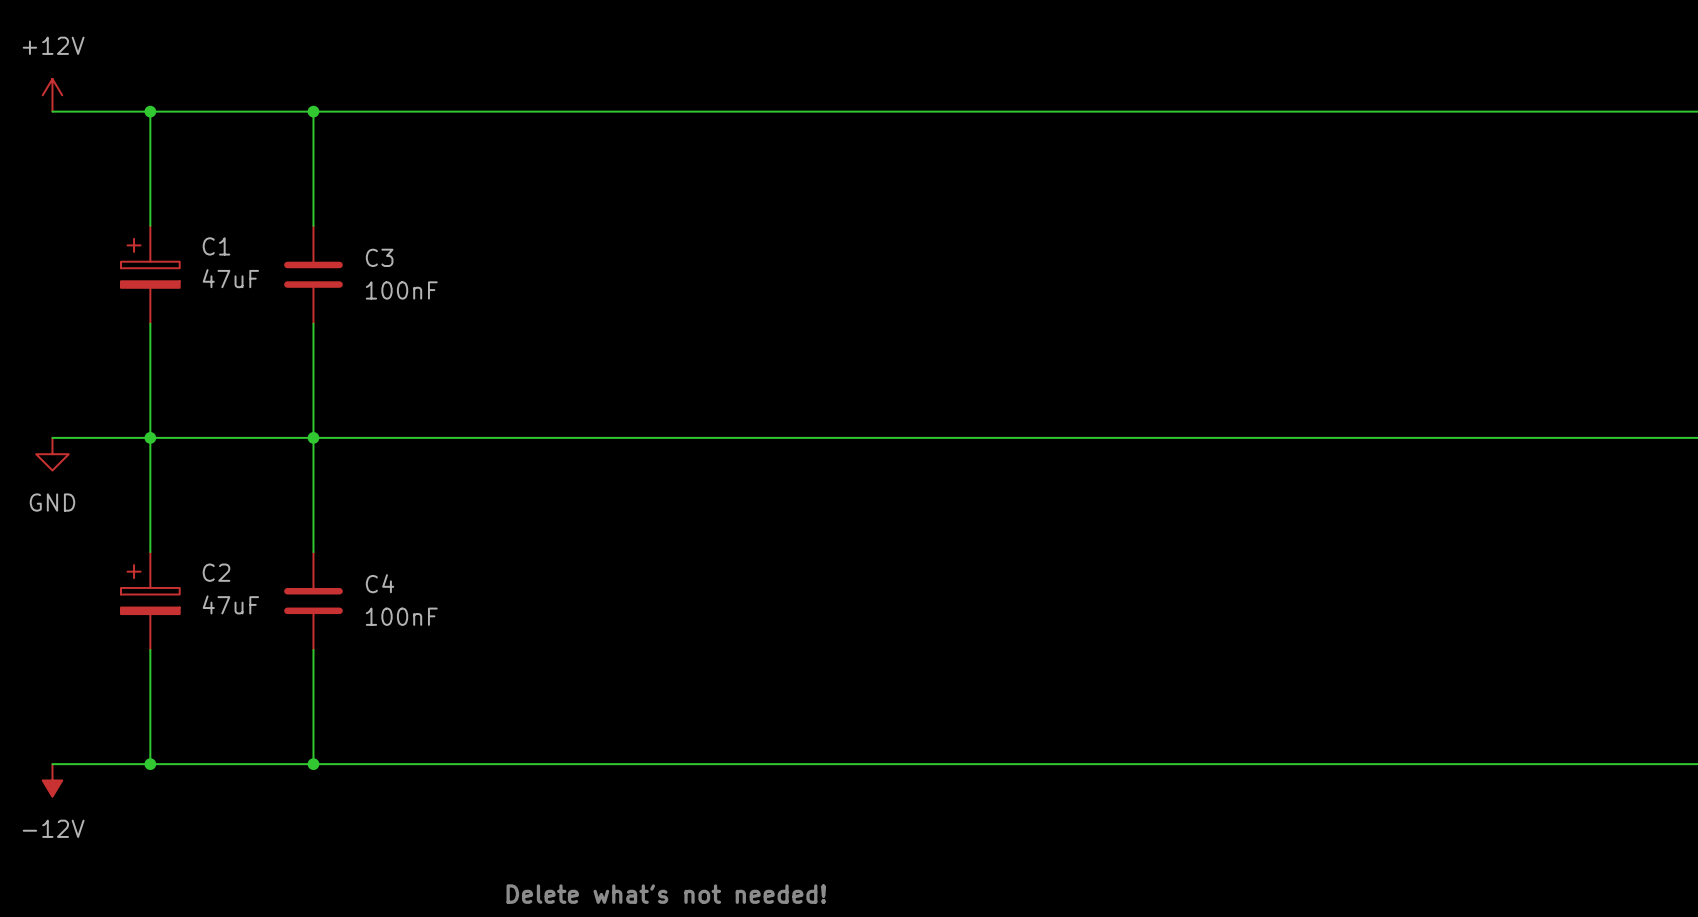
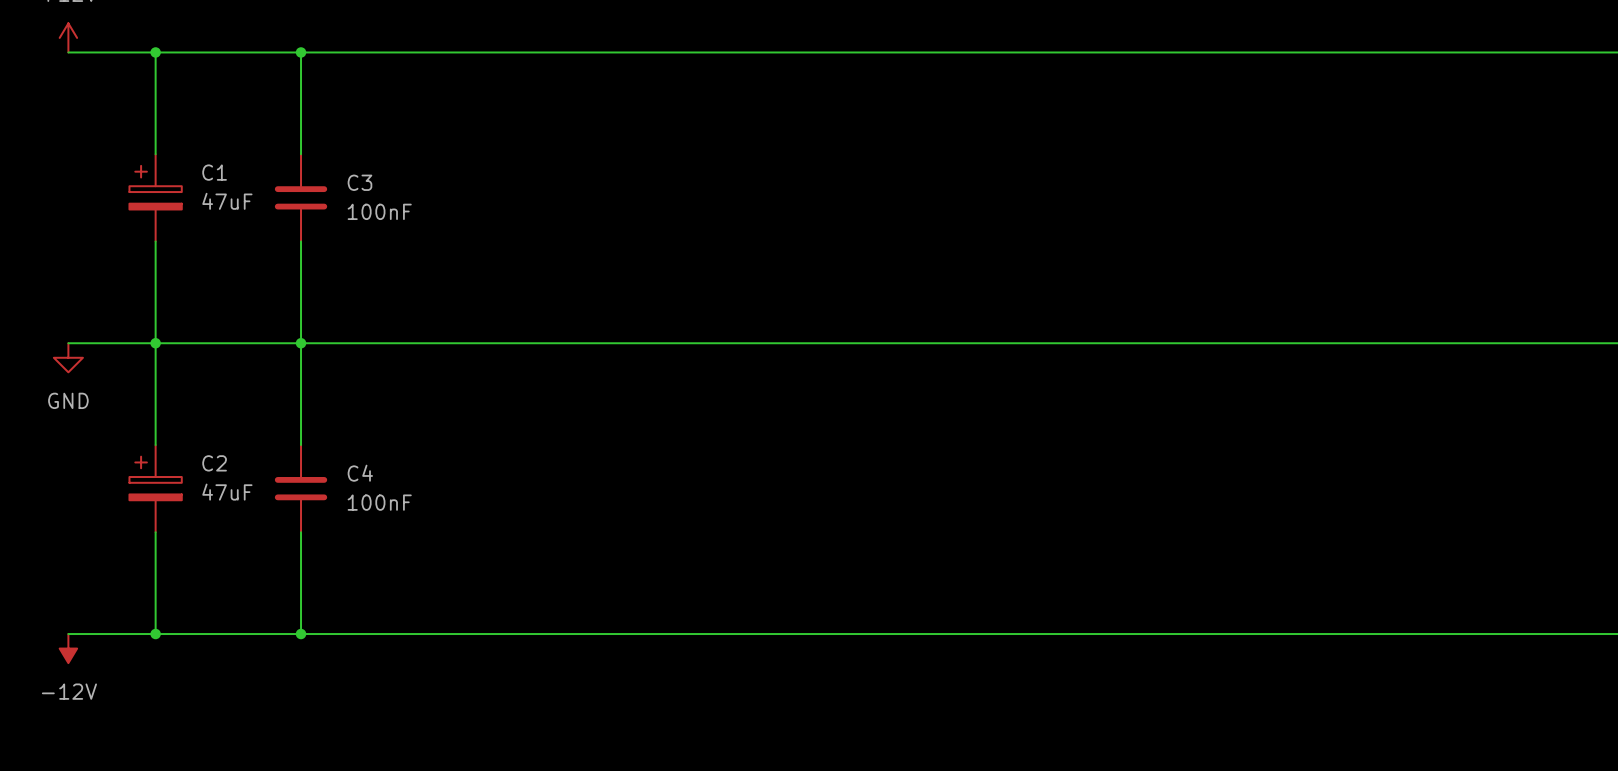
text: Delete what's not needed! (666, 894) -> none

